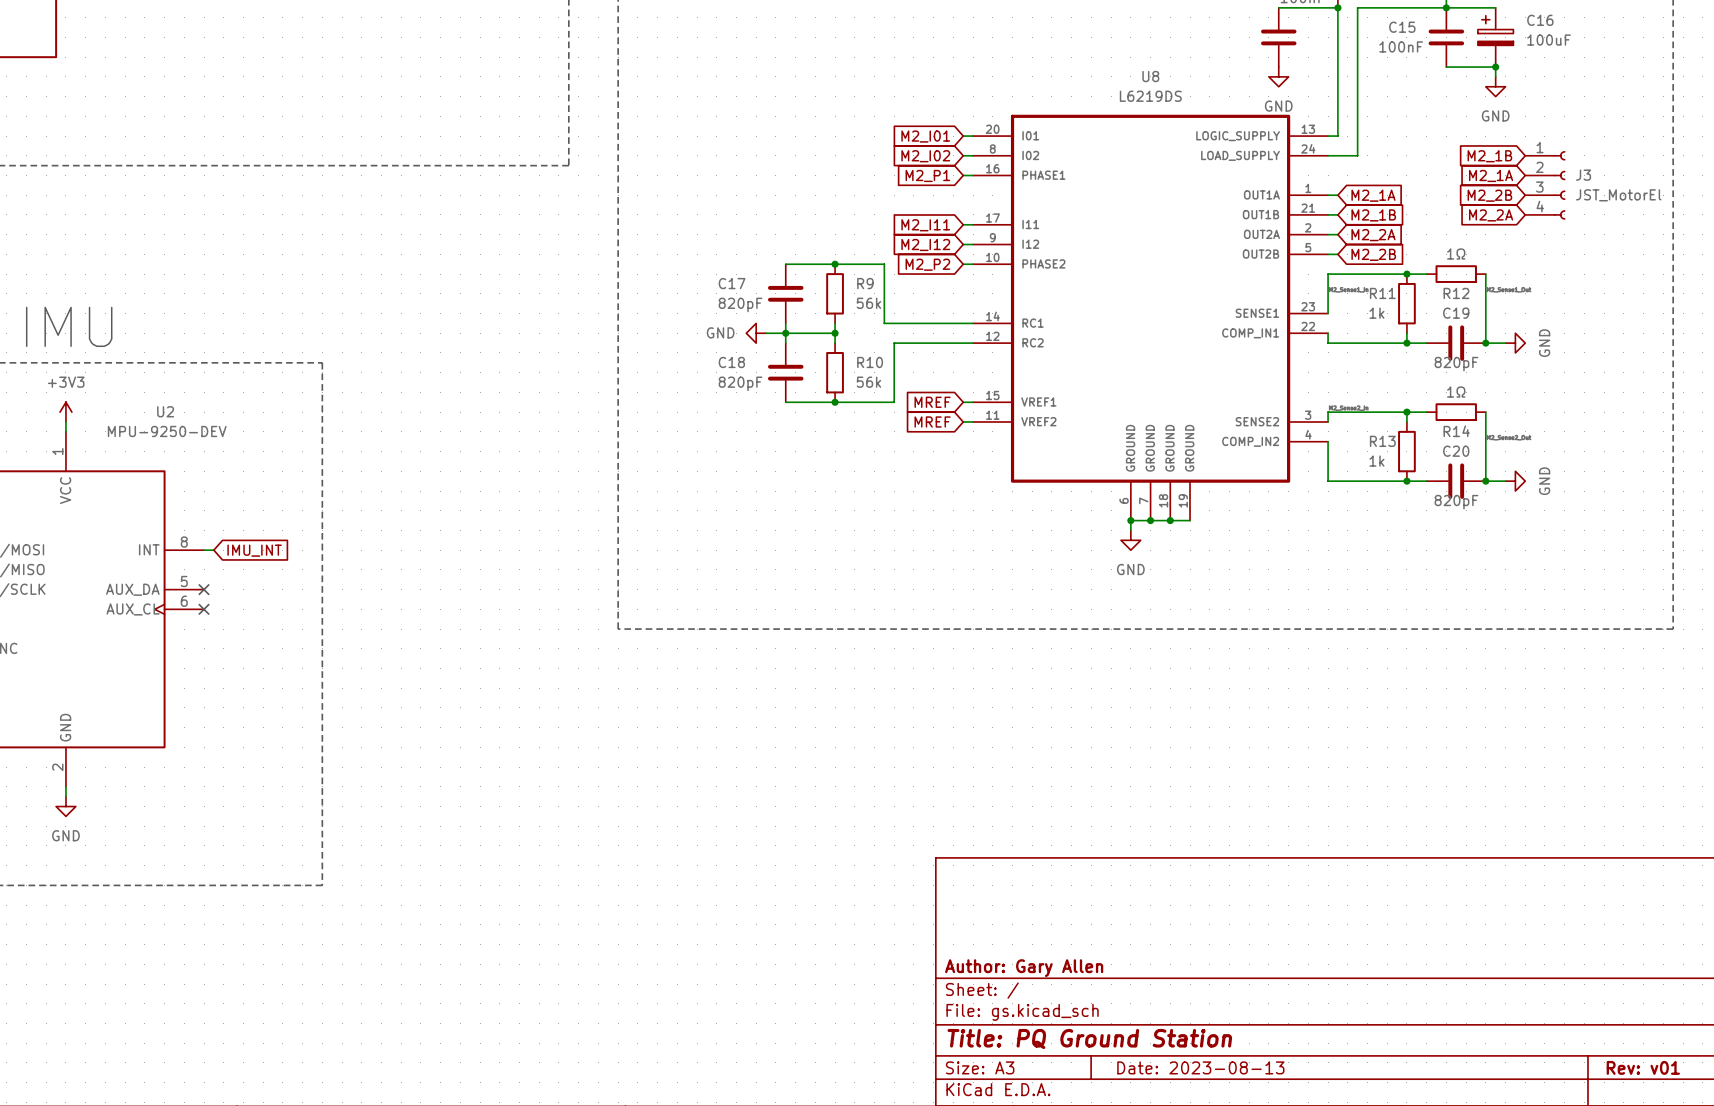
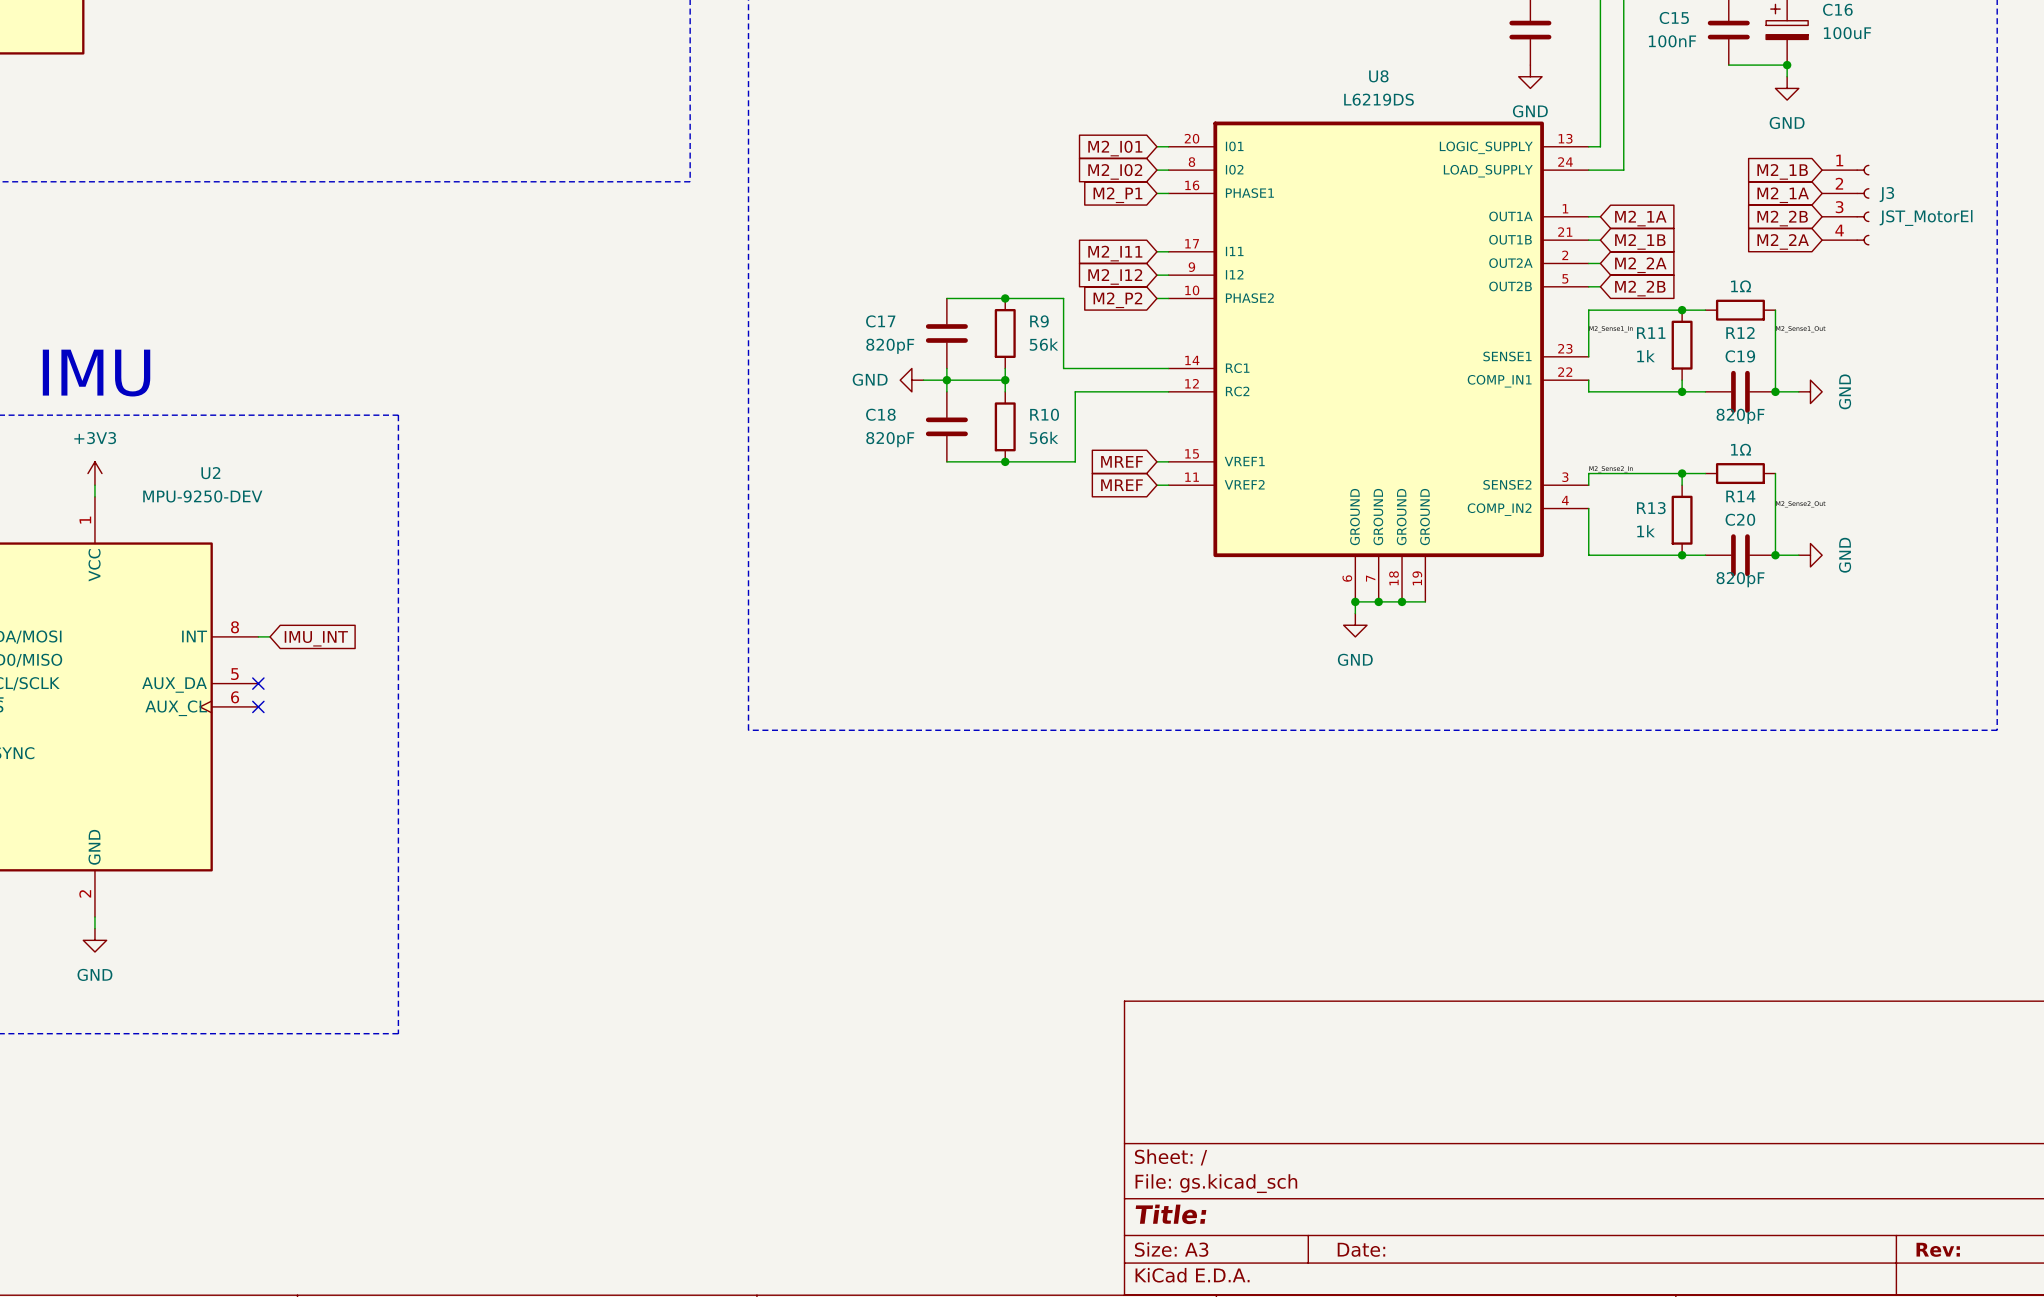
title block: Author: Gary Allen (1024, 968) -> none
title block: Title: PQ Ground Station (1089, 1038) -> Title: (1170, 1214)
title block: Date: 2023-08-13 (1200, 1067) -> Date: (1361, 1249)
title block: Rev: v01 (1643, 1067) -> Rev: (1938, 1249)

